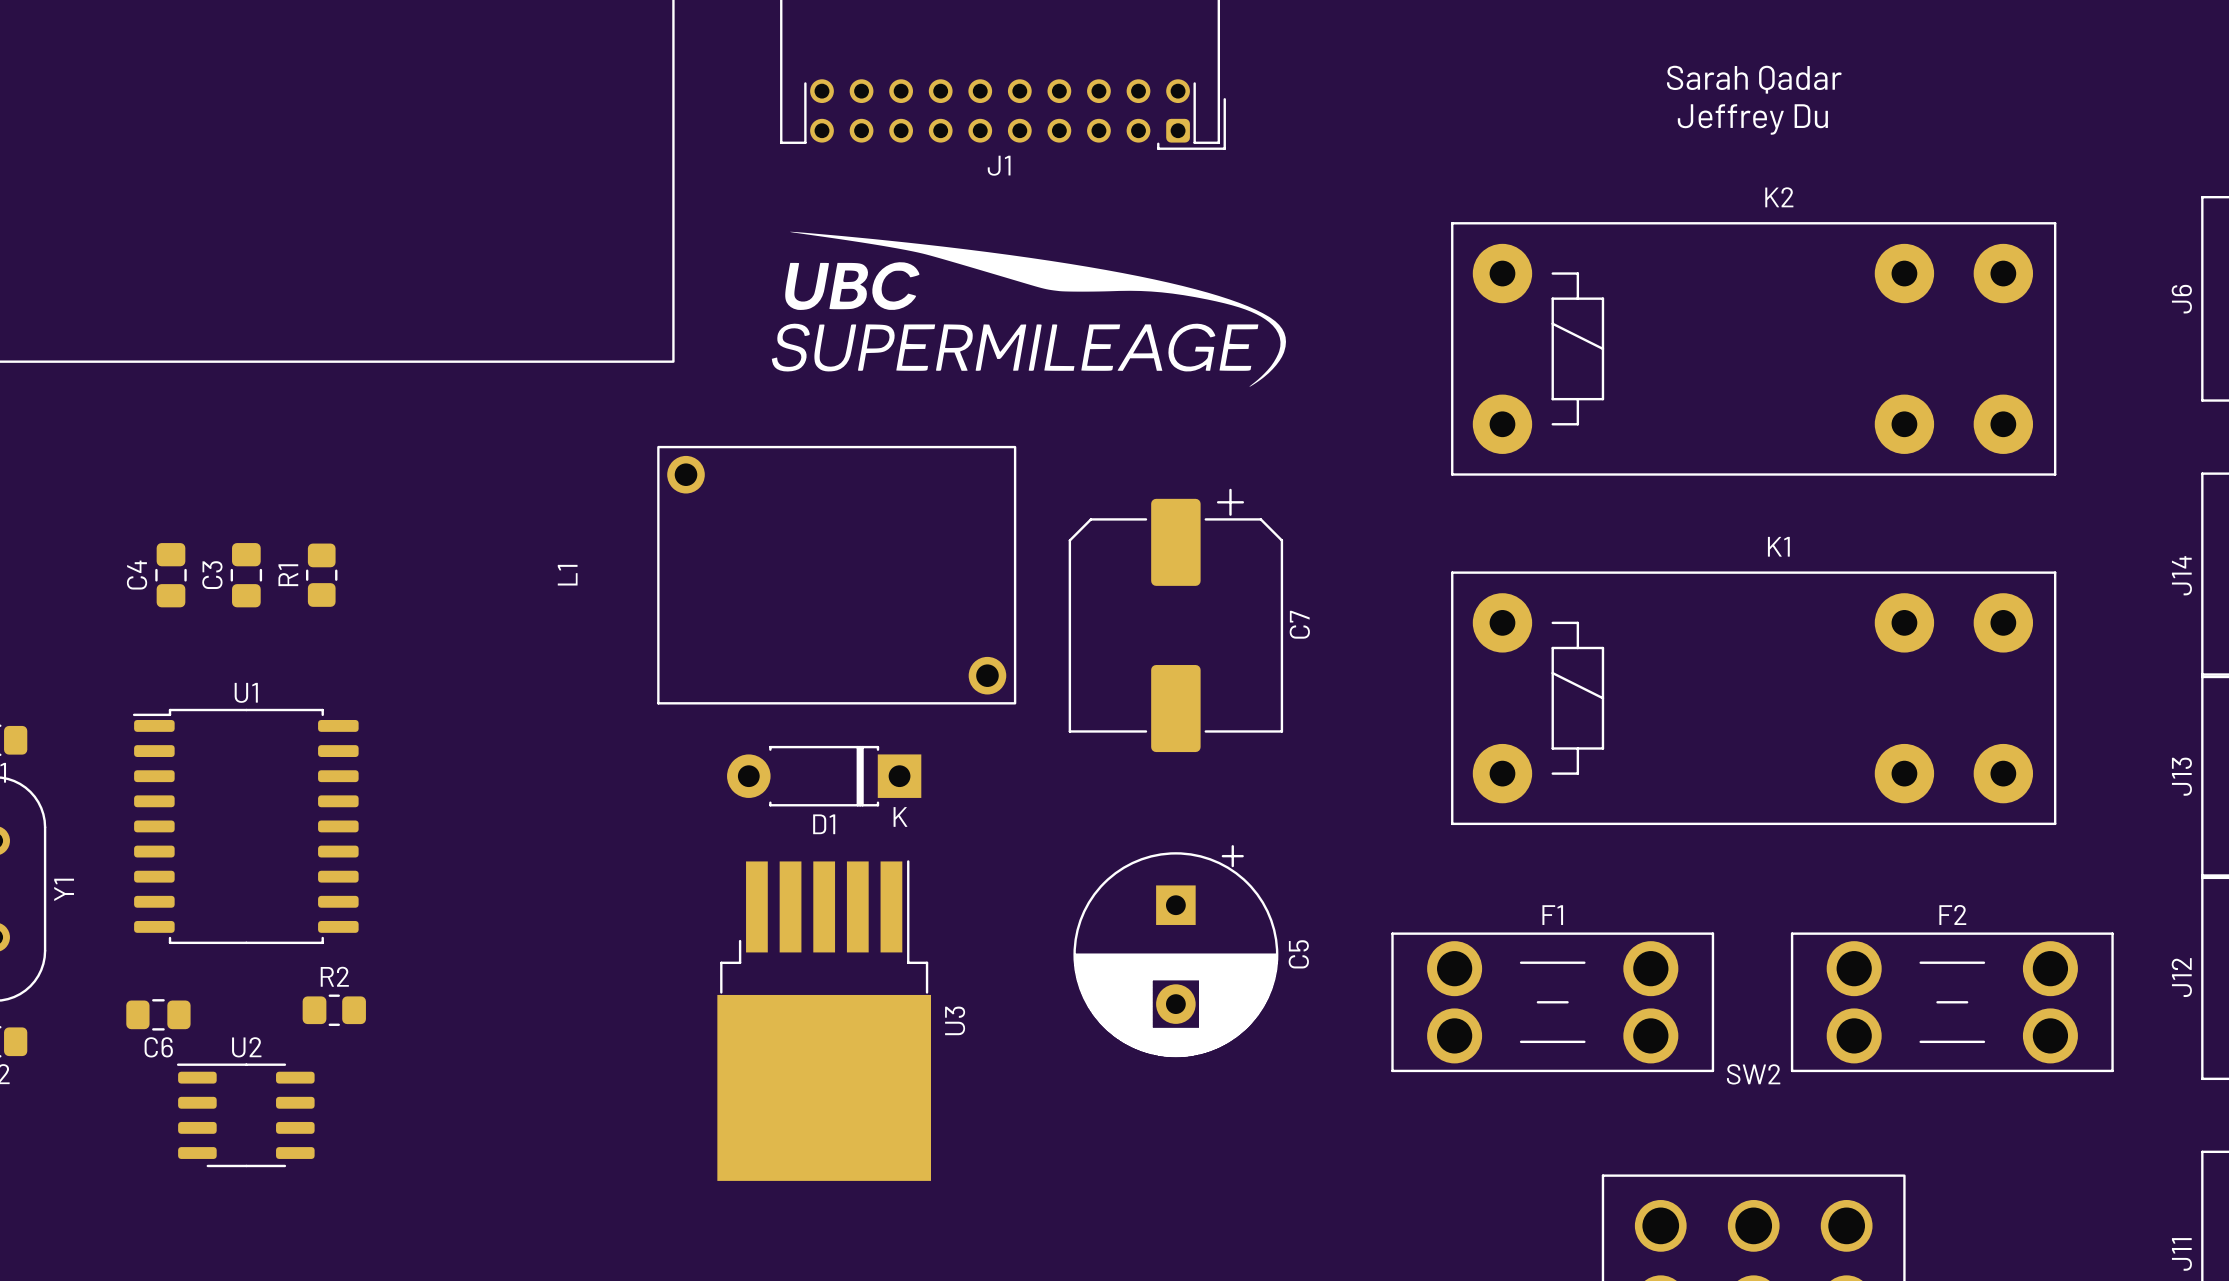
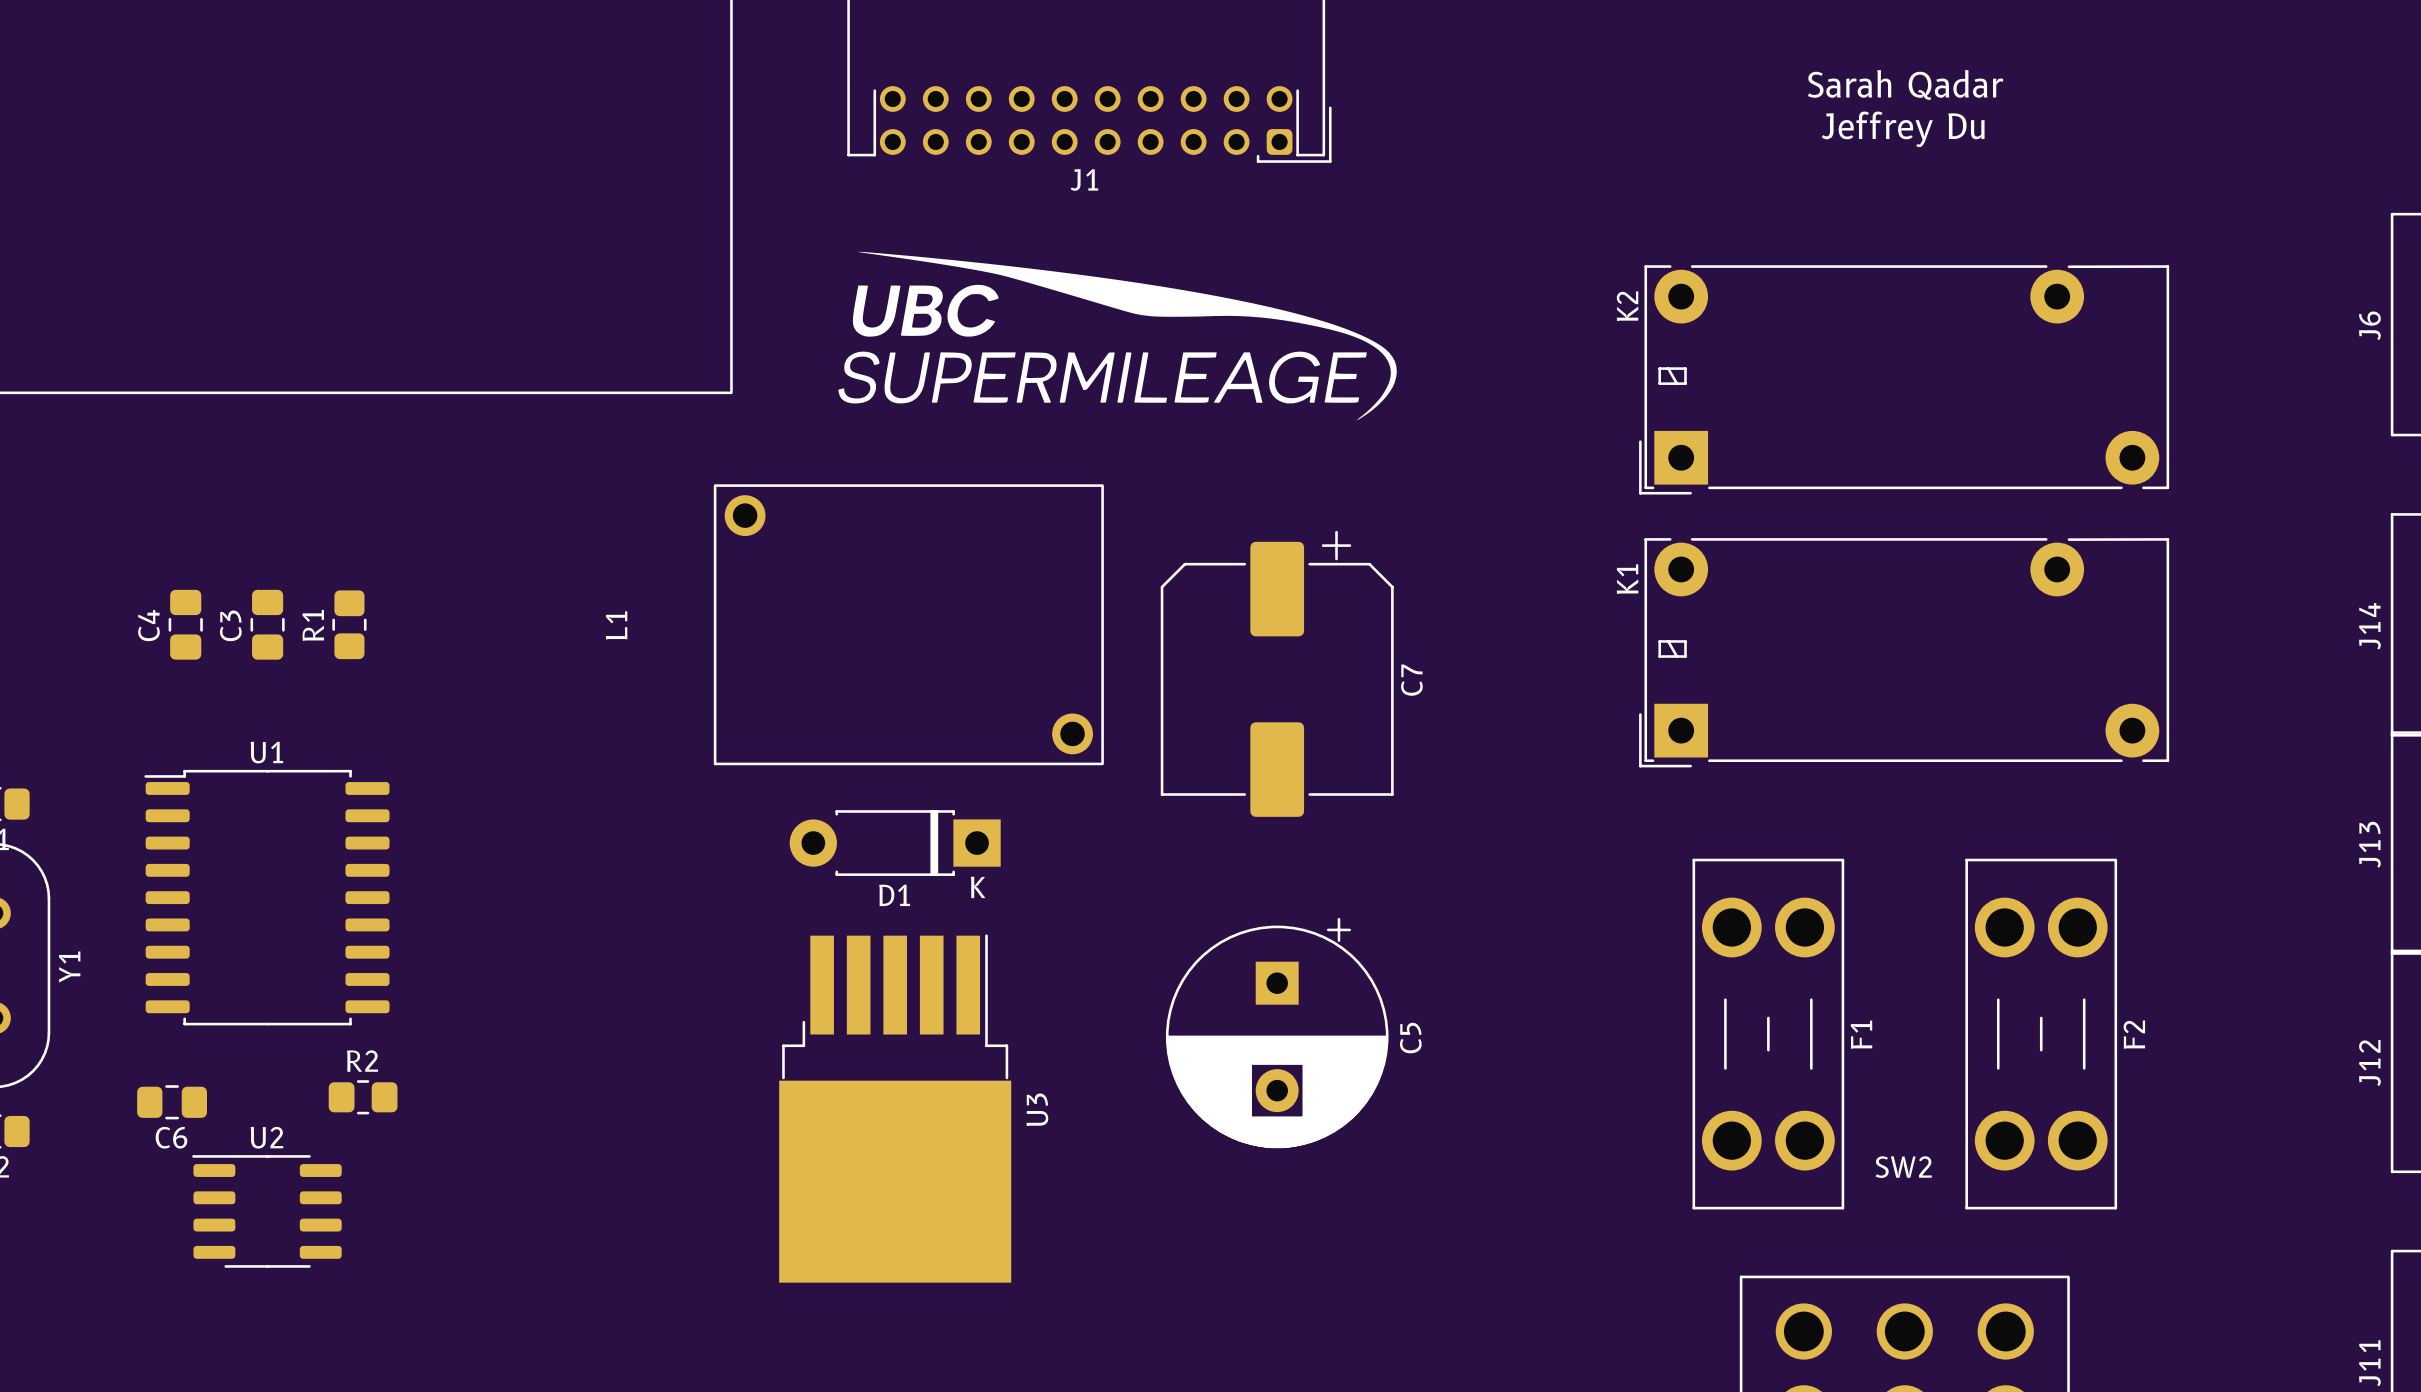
K2 name position: K2 (1779, 197) -> K2 (1627, 306)
K2 footprint: [1451, 222, 2057, 476] -> [1639, 265, 2170, 495]
K1 name position: K1 (1778, 546) -> K1 (1627, 579)
K1 footprint: [1451, 571, 2057, 826] -> [1639, 538, 2170, 768]
F1 rotation: 0° (1552, 1002) -> 90° clockwise (1768, 1034)
F2 rotation: 0° (1952, 1002) -> 90° clockwise (2041, 1034)

